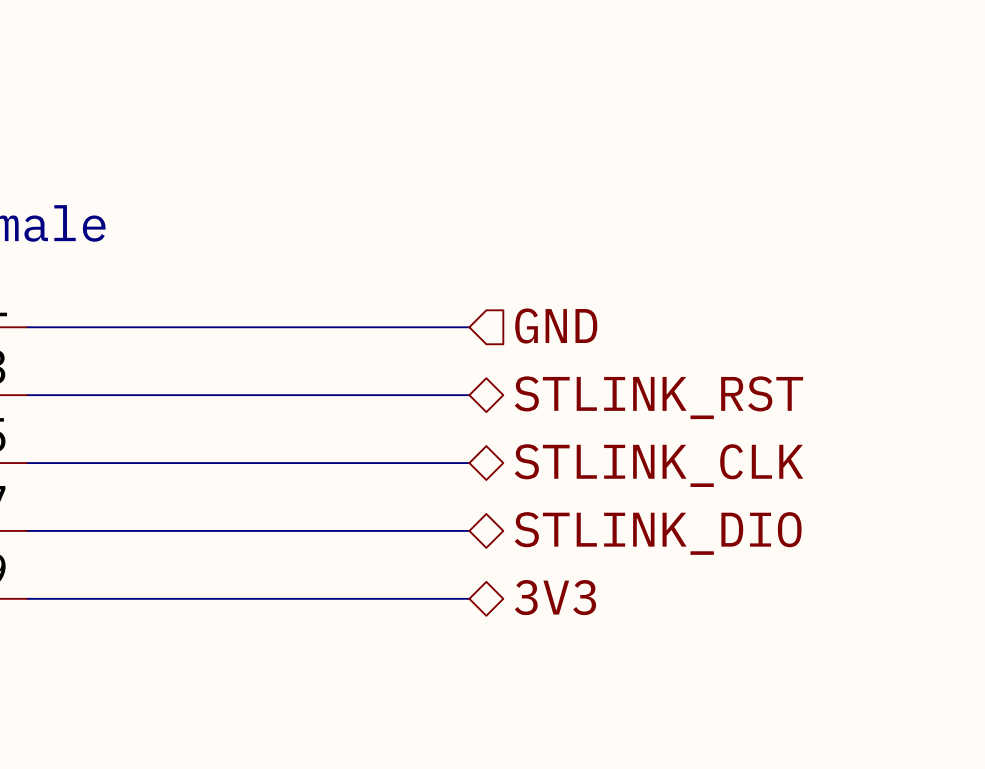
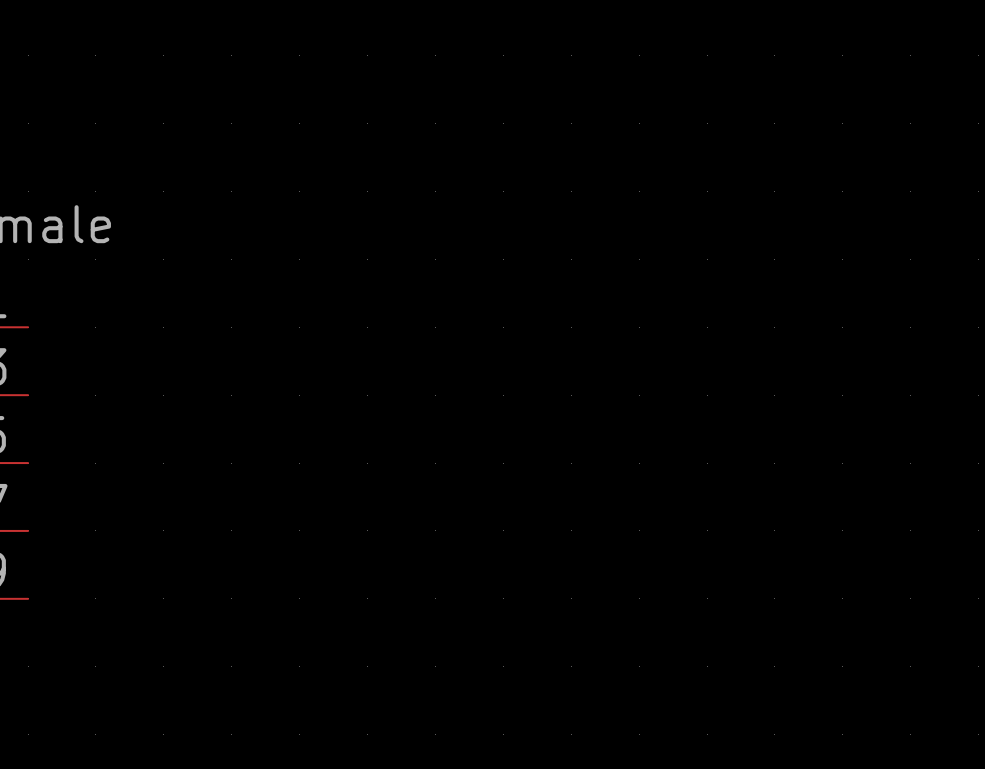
hierarchical label: GND (556, 326) -> none
wire: (28, 327) (469, 327) -> none
wire: (28, 395) (469, 395) -> none
hierarchical label: STLINK_RST (658, 397) -> none
wire: (28, 463) (469, 463) -> none
hierarchical label: STLINK_CLK (658, 465) -> none
wire: (28, 530) (469, 530) -> none
hierarchical label: STLINK_DIO (658, 533) -> none
hierarchical label: 3V3 (555, 597) -> none
wire: (28, 598) (469, 598) -> none

